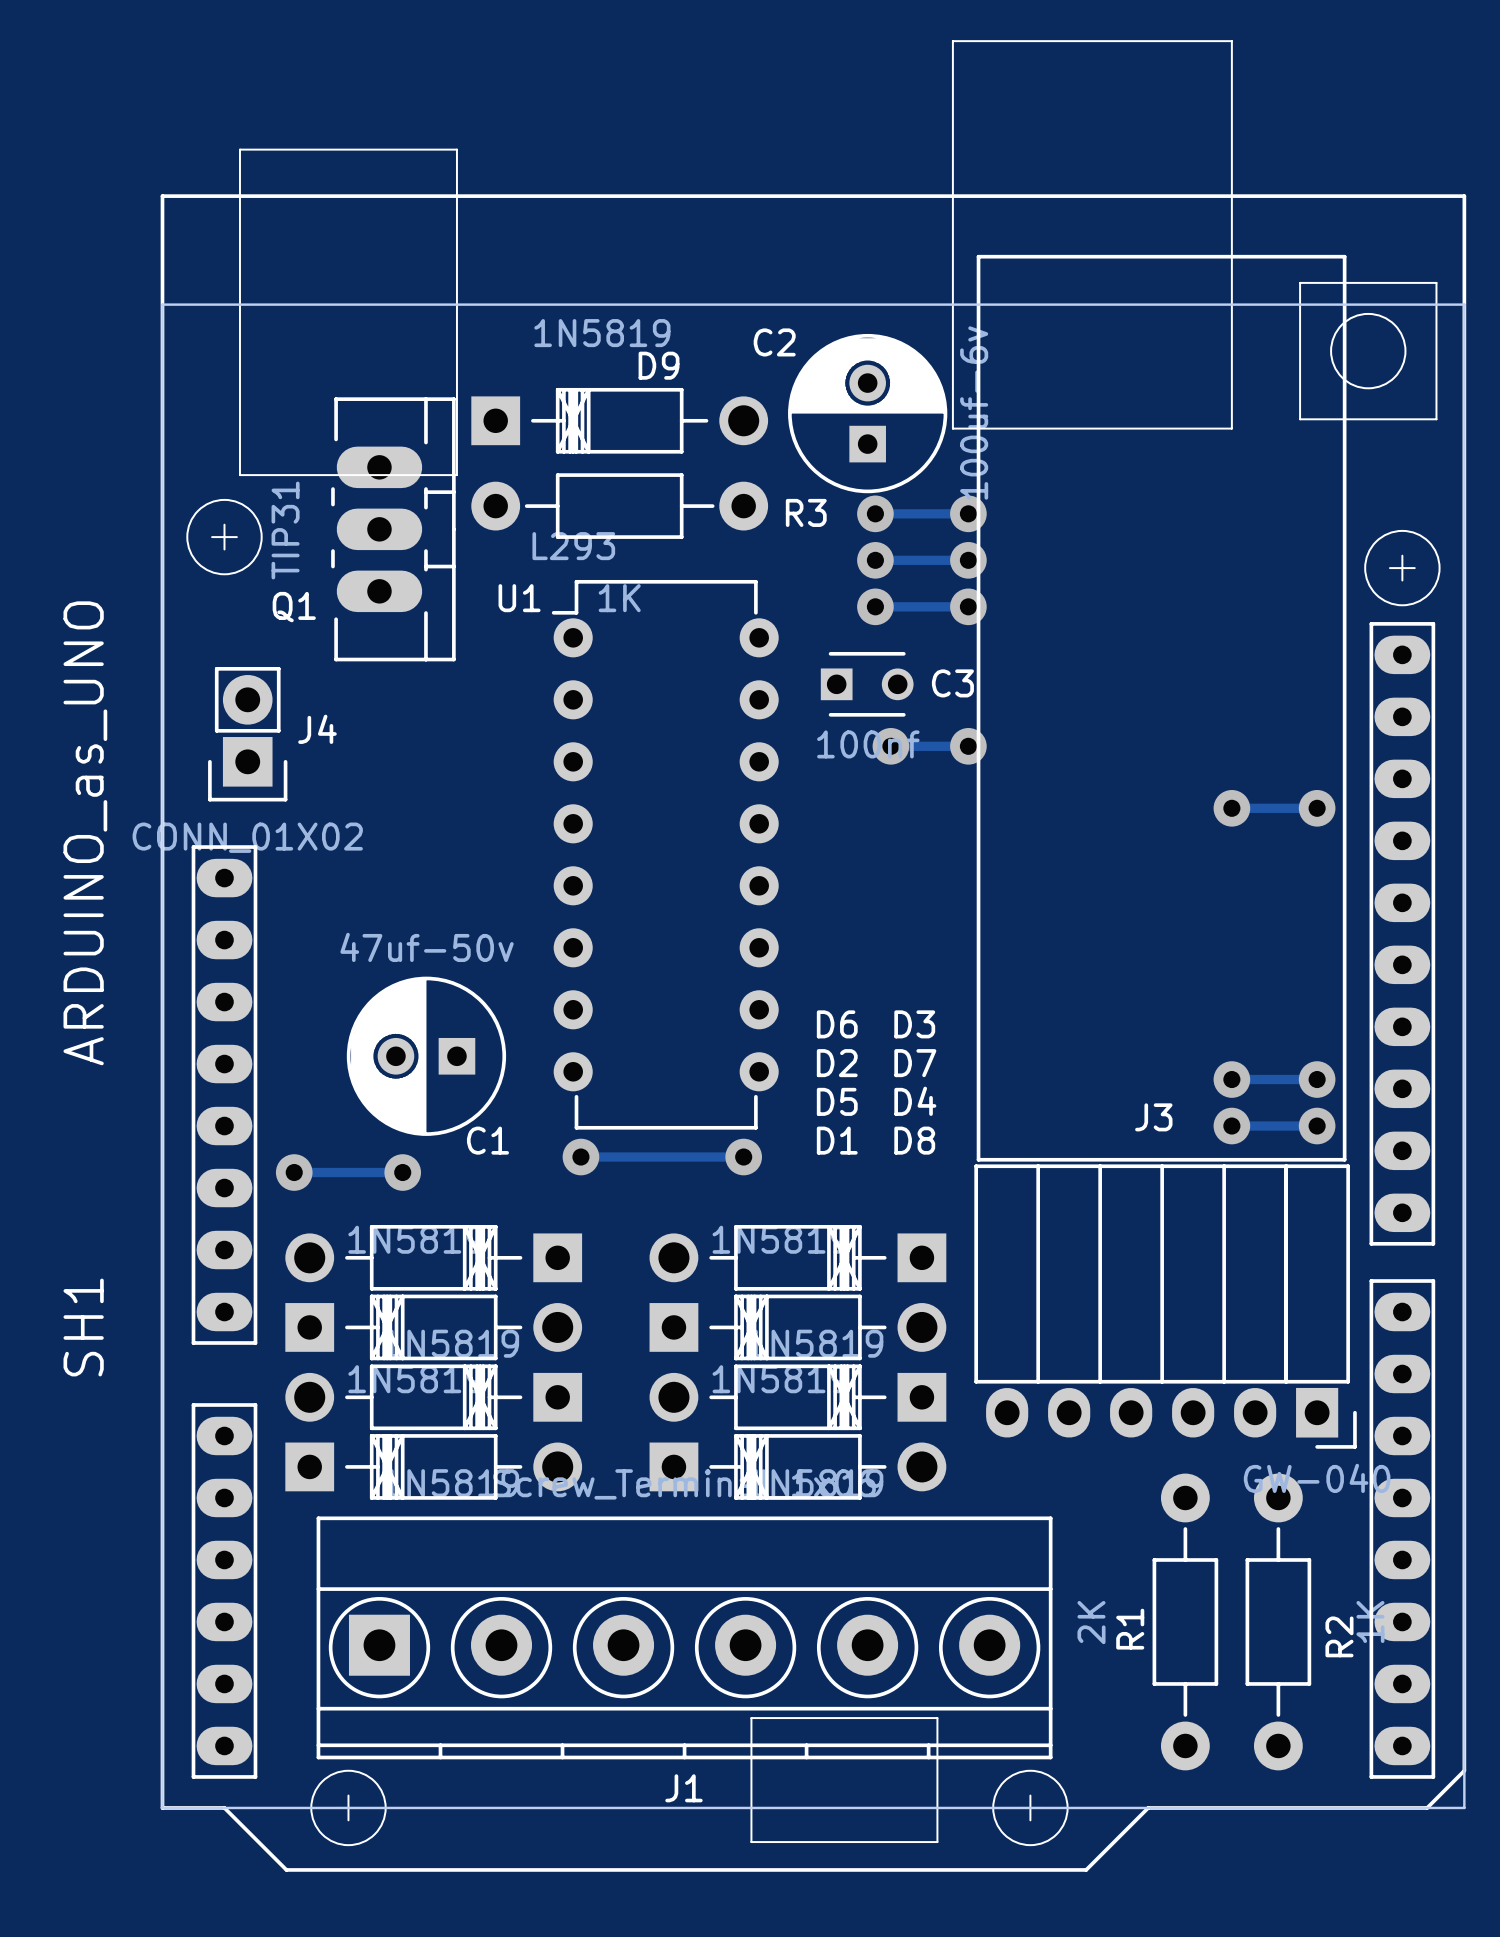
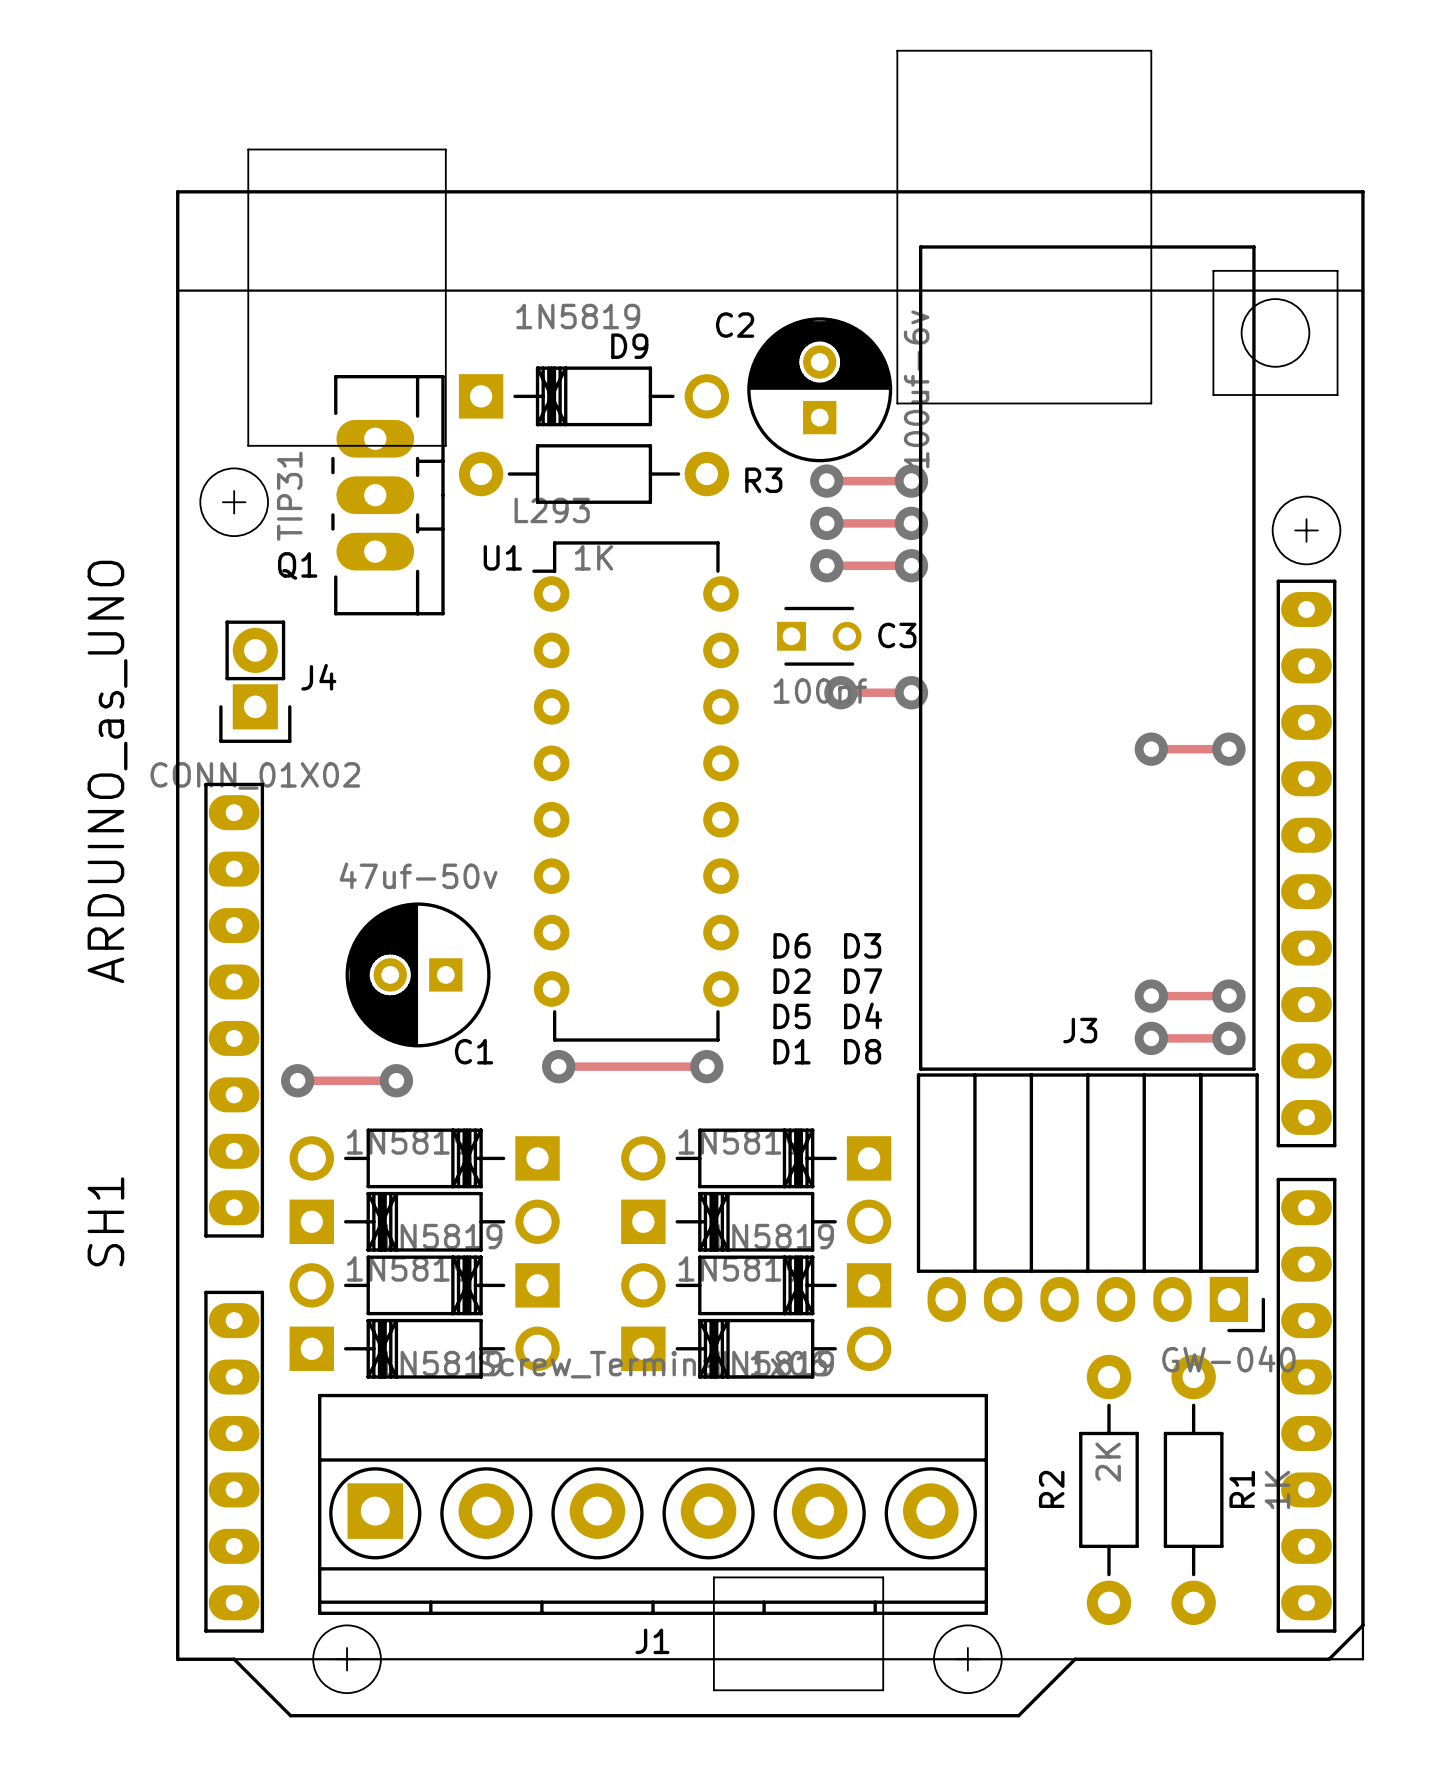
R2 value position: 2K (1091, 1622) -> 2K (1108, 1462)
R1 name position: R1 (1130, 1629) -> R1 (1242, 1489)
R2 name position: R2 (1339, 1636) -> R2 (1051, 1489)

